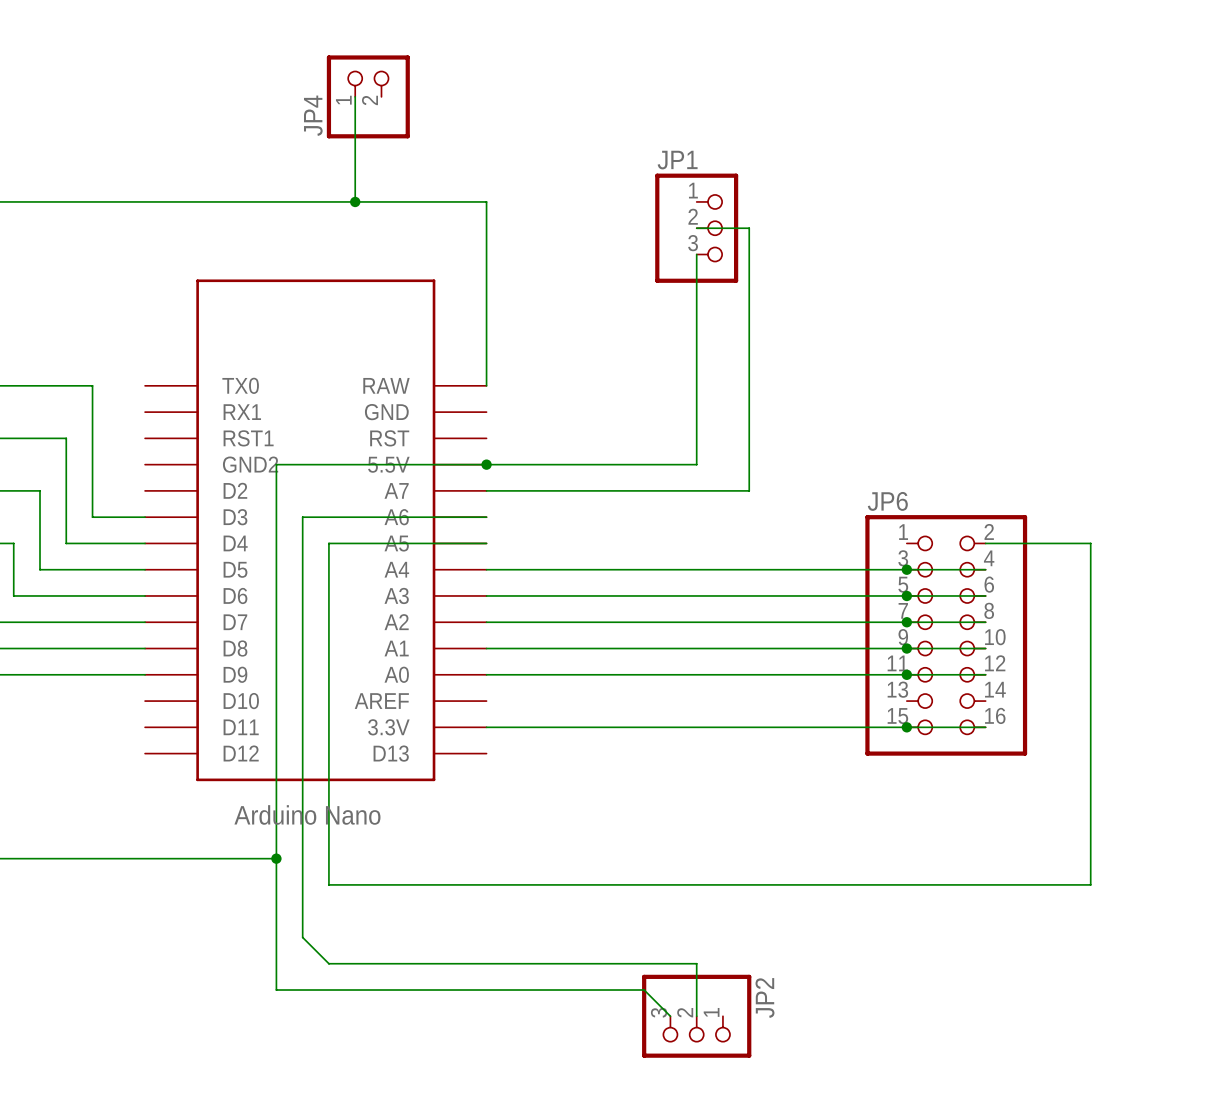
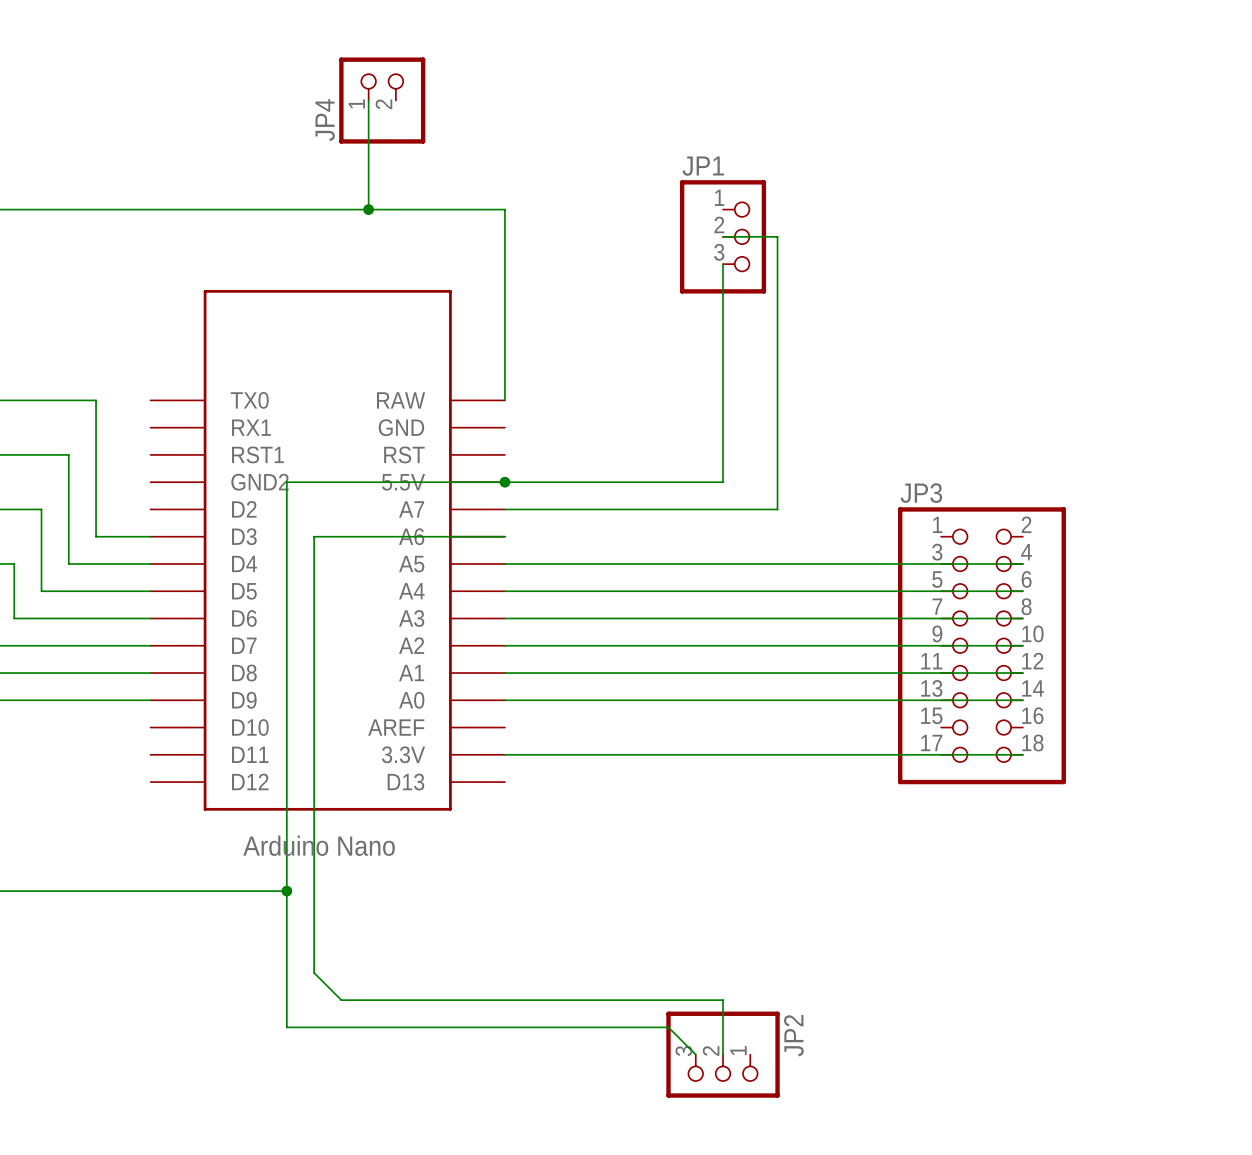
wire: (486, 543) (328, 543) (328, 884) (1090, 884) (1090, 543) (985, 543) -> (504, 563) (1022, 563)
junction: (906, 569) -> none
junction: (906, 595) -> none
junction: (906, 622) -> none
JP3: none -> (981, 645)
JP6: (946, 635) -> none
junction: (906, 648) -> none
junction: (906, 674) -> none
junction: (906, 727) -> none

